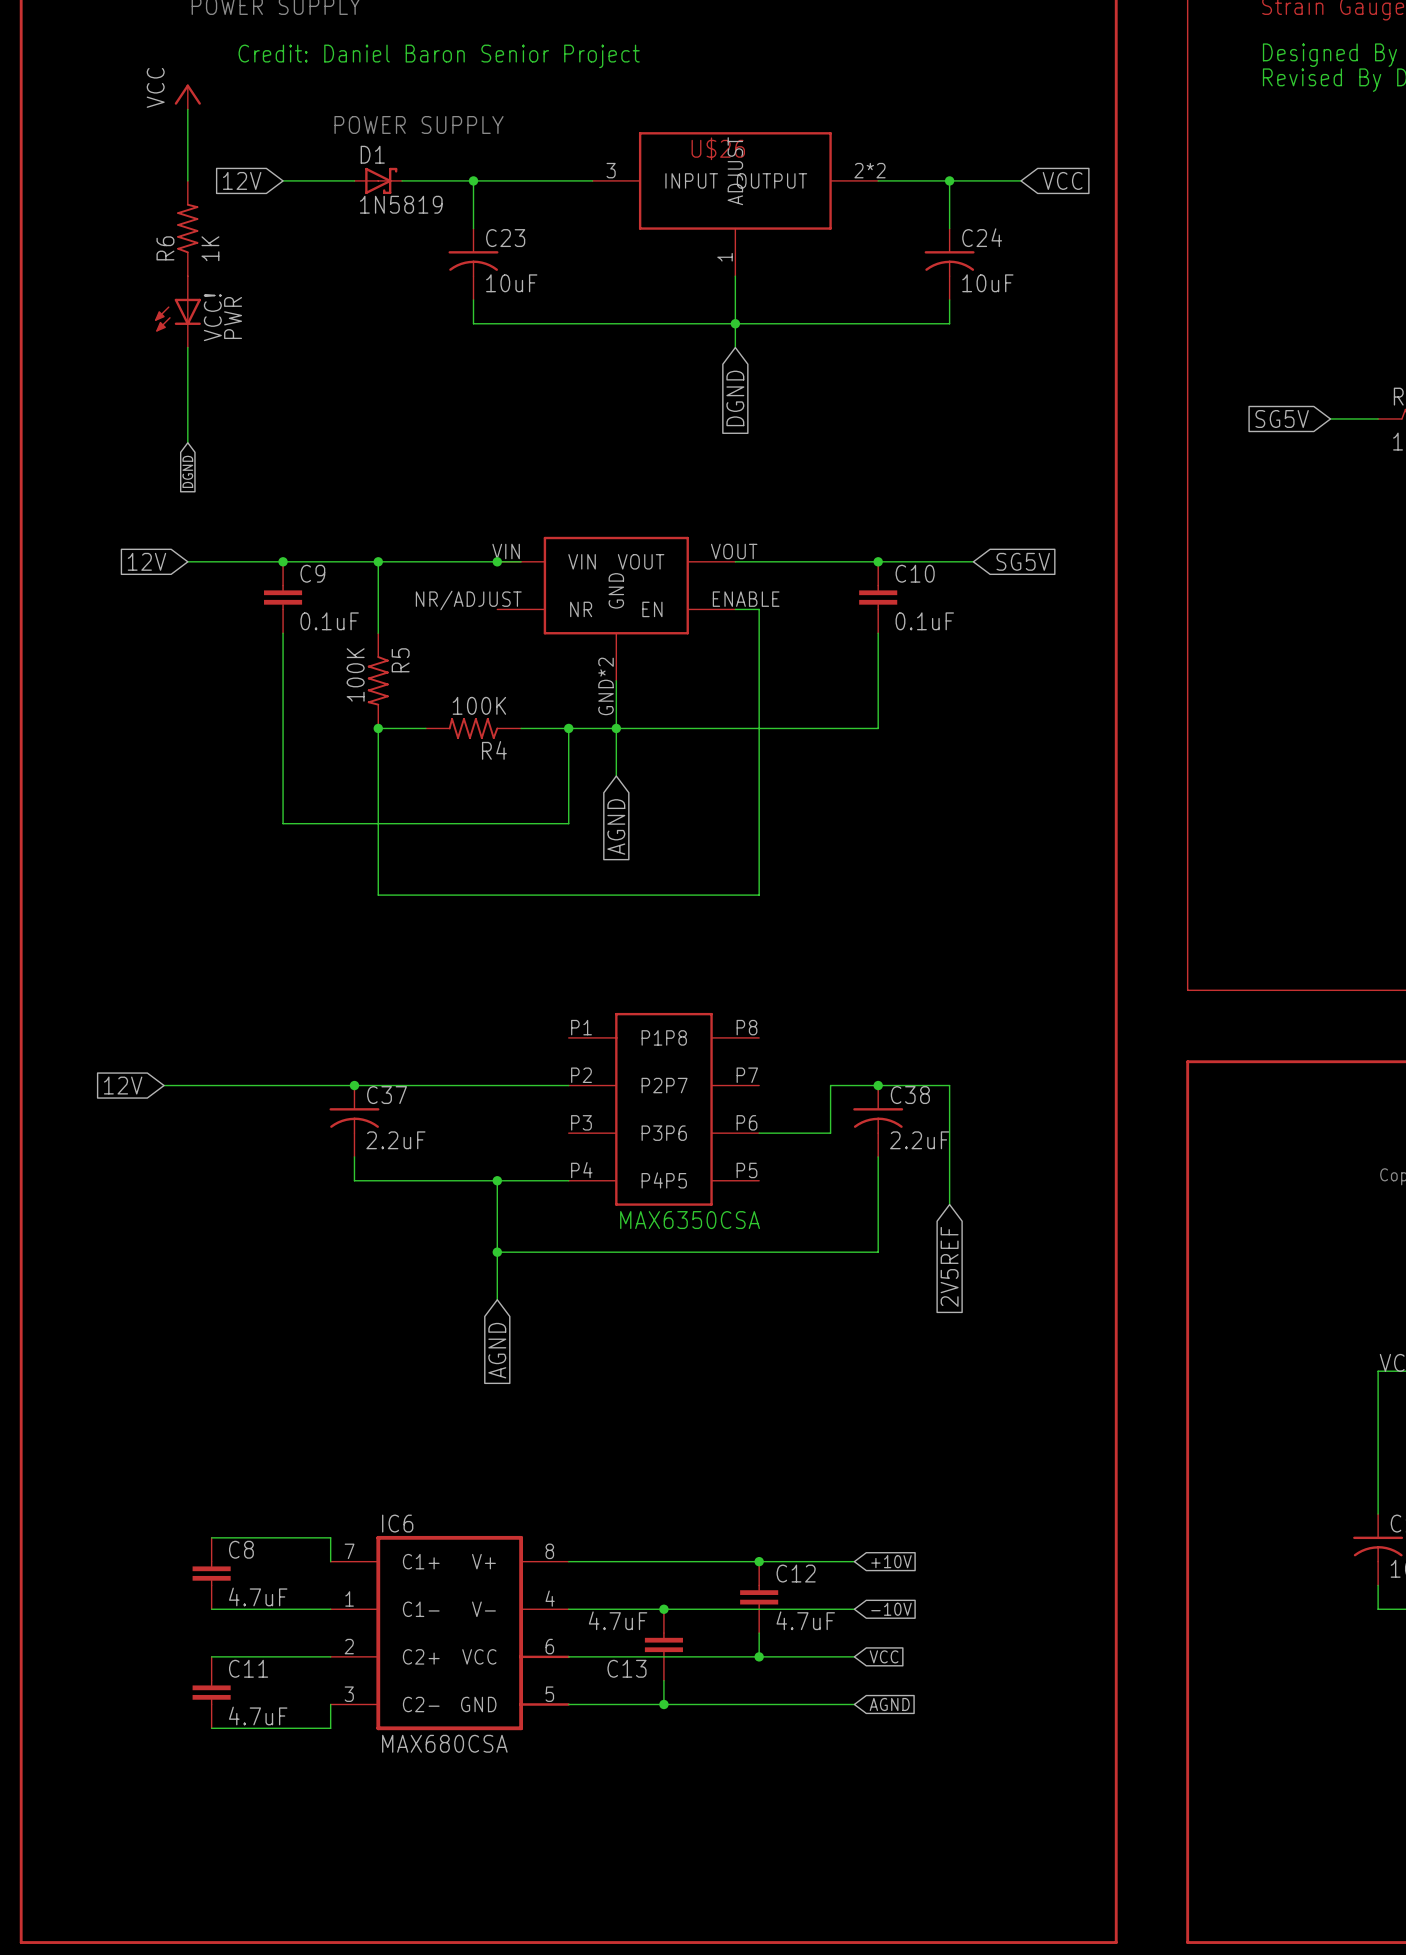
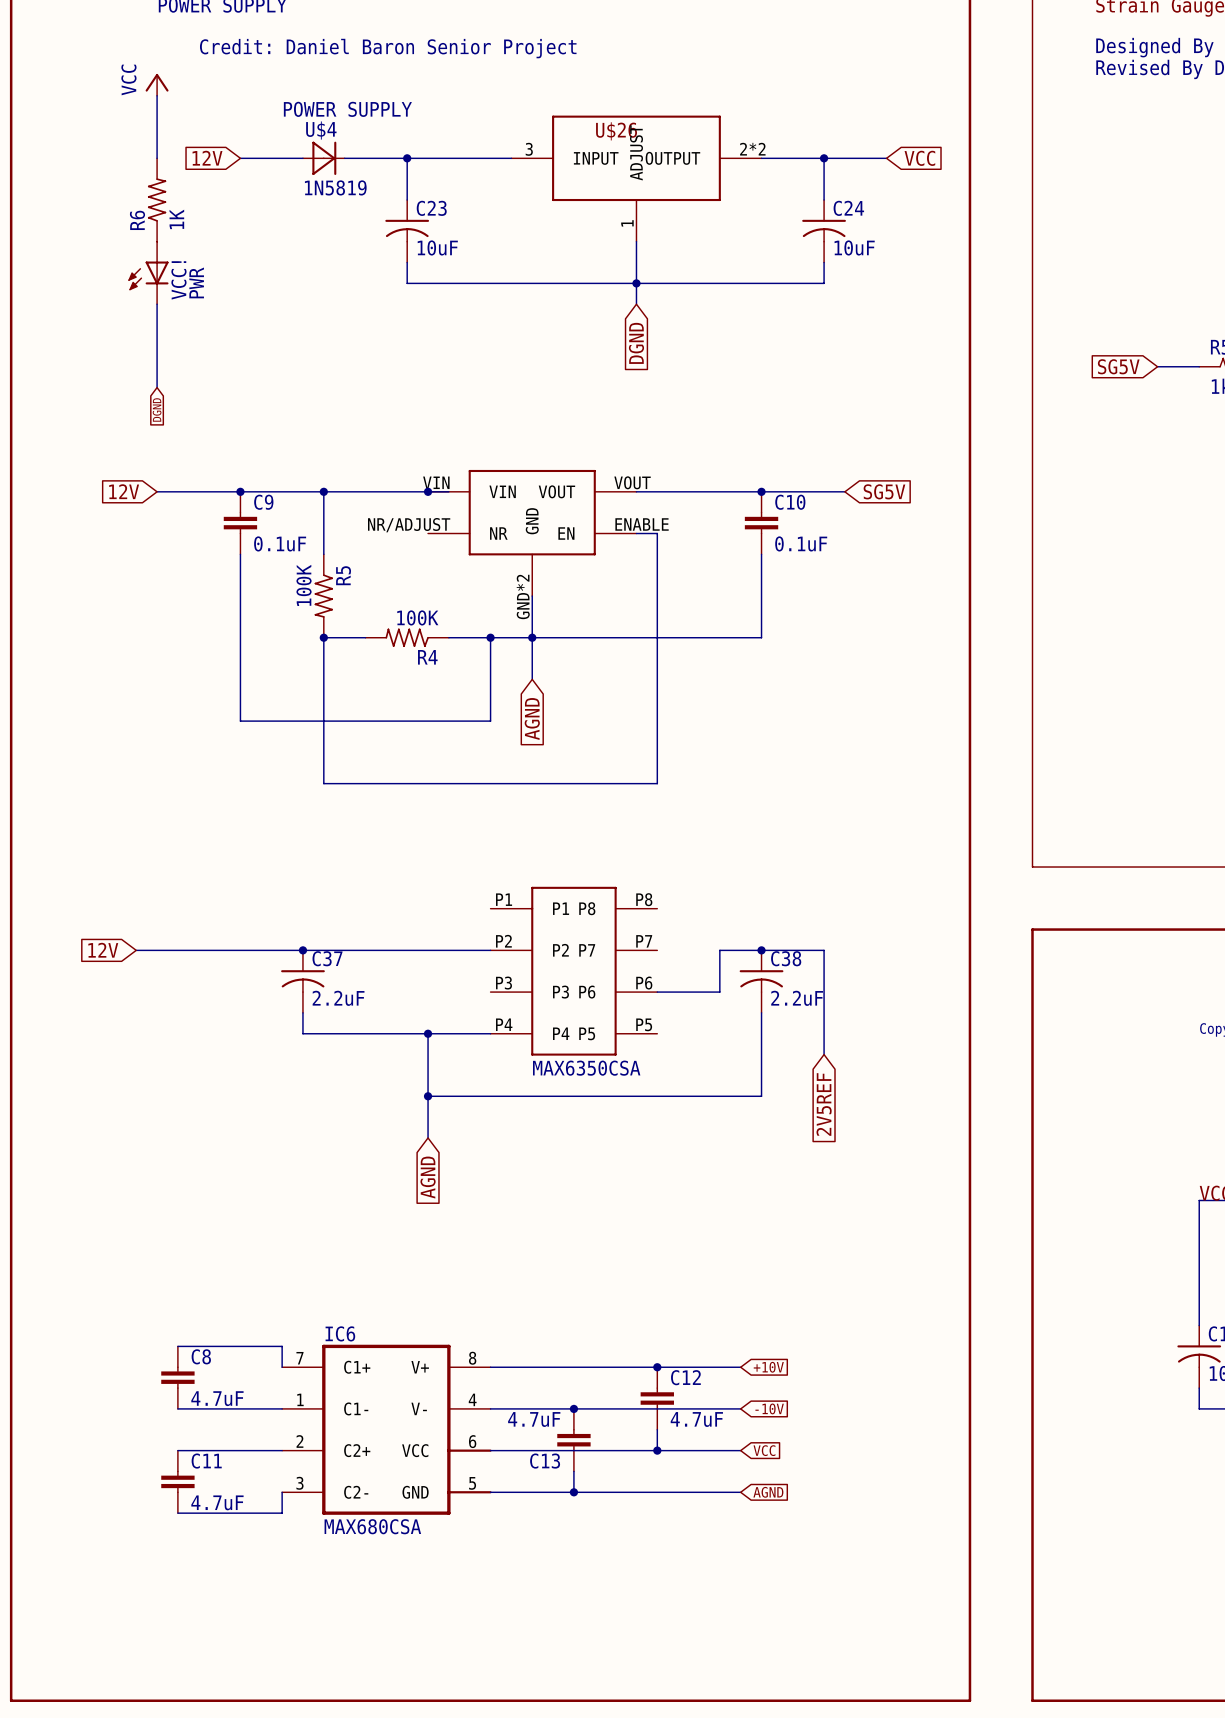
D1: 1N5819 (378, 180) -> none
U$4: none -> 1N5819 (323, 158)

